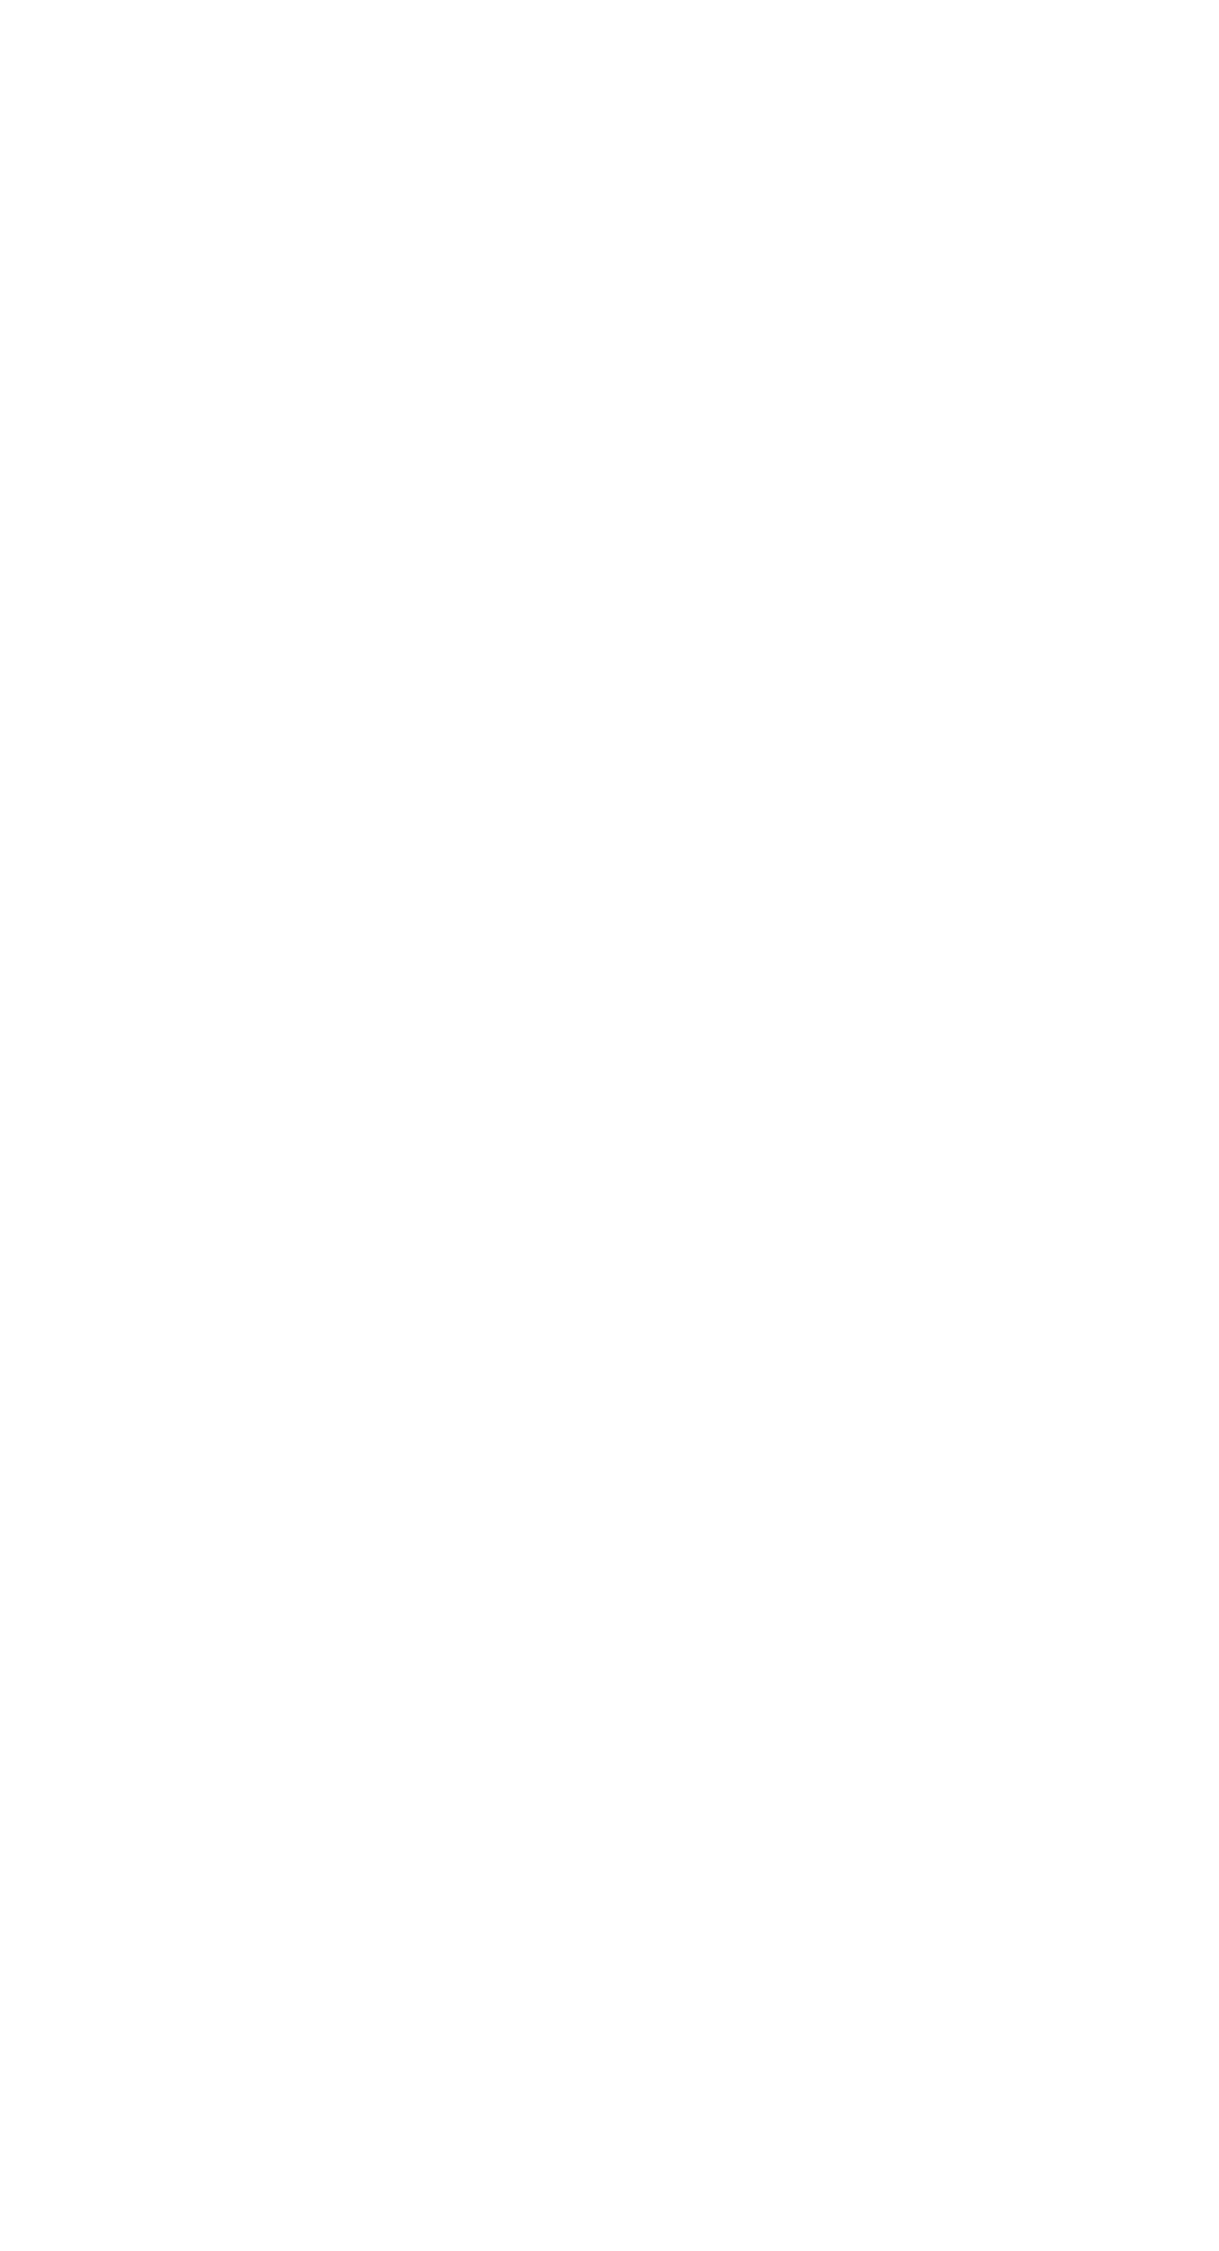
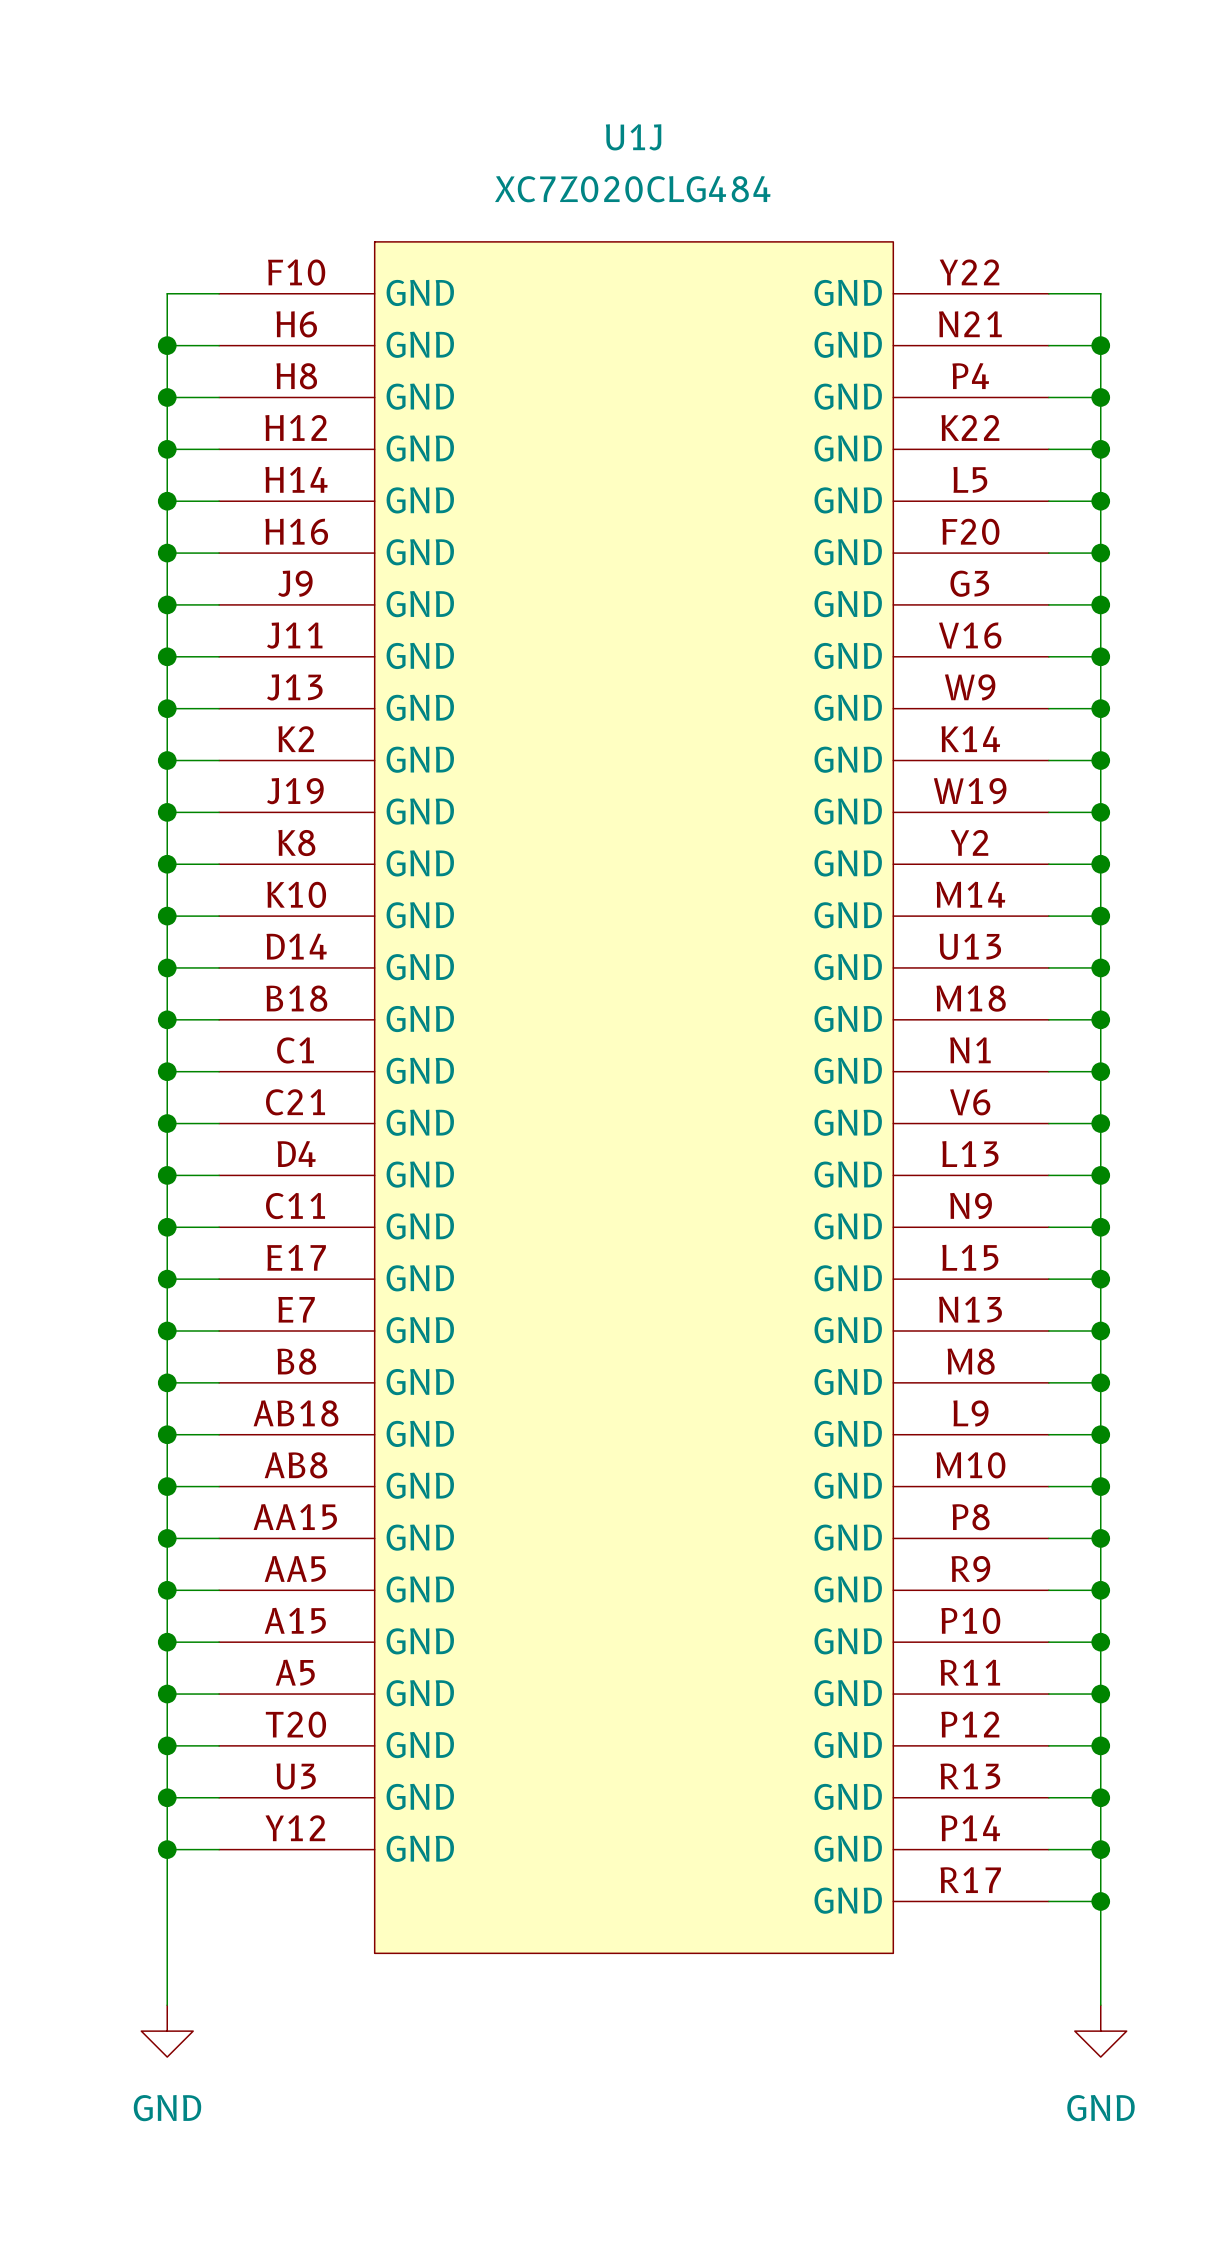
wire: none -> (219, 293) (167, 293) (167, 2005)
wire: none -> (1048, 293) (1100, 293) (1100, 2005)
wire: none -> (167, 345) (219, 345)
junction: none -> (167, 345)
wire: none -> (1048, 345) (1100, 345)
junction: none -> (1100, 345)
wire: none -> (167, 397) (219, 397)
junction: none -> (167, 397)
wire: none -> (1048, 397) (1100, 397)
junction: none -> (1100, 397)
wire: none -> (167, 449) (219, 449)
junction: none -> (167, 449)
wire: none -> (1048, 449) (1100, 449)
junction: none -> (1100, 449)
wire: none -> (167, 501) (219, 501)
junction: none -> (167, 501)
wire: none -> (1048, 501) (1100, 501)
junction: none -> (1100, 501)
wire: none -> (167, 553) (219, 553)
junction: none -> (167, 553)
wire: none -> (1048, 553) (1100, 553)
junction: none -> (1100, 553)
wire: none -> (167, 604) (219, 604)
junction: none -> (167, 604)
wire: none -> (1048, 604) (1100, 604)
junction: none -> (1100, 604)
wire: none -> (167, 656) (219, 656)
junction: none -> (167, 656)
wire: none -> (1048, 656) (1100, 656)
junction: none -> (1100, 656)
wire: none -> (167, 708) (219, 708)
junction: none -> (167, 708)
wire: none -> (1048, 708) (1100, 708)
junction: none -> (1100, 708)
wire: none -> (167, 760) (219, 760)
junction: none -> (167, 760)
wire: none -> (1048, 760) (1100, 760)
junction: none -> (1100, 760)
wire: none -> (167, 812) (219, 812)
junction: none -> (167, 812)
wire: none -> (1048, 812) (1100, 812)
junction: none -> (1100, 812)
wire: none -> (167, 864) (219, 864)
junction: none -> (167, 864)
wire: none -> (1048, 864) (1100, 864)
junction: none -> (1100, 864)
wire: none -> (167, 916) (219, 916)
junction: none -> (167, 916)
wire: none -> (1048, 916) (1100, 916)
junction: none -> (1100, 916)
wire: none -> (167, 967) (219, 967)
junction: none -> (167, 967)
wire: none -> (1048, 967) (1100, 967)
junction: none -> (1100, 967)
wire: none -> (167, 1019) (219, 1019)
junction: none -> (167, 1019)
wire: none -> (1048, 1019) (1100, 1019)
junction: none -> (1100, 1019)
wire: none -> (167, 1071) (219, 1071)
junction: none -> (167, 1071)
wire: none -> (1048, 1071) (1100, 1071)
junction: none -> (1100, 1071)
U1J: none -> XC7Z020CLG484 (633, 1097)
wire: none -> (167, 1123) (219, 1123)
junction: none -> (167, 1123)
wire: none -> (1048, 1123) (1100, 1123)
junction: none -> (1100, 1123)
wire: none -> (167, 1175) (219, 1175)
junction: none -> (167, 1175)
wire: none -> (1048, 1175) (1100, 1175)
junction: none -> (1100, 1175)
wire: none -> (167, 1227) (219, 1227)
junction: none -> (167, 1227)
wire: none -> (1048, 1227) (1100, 1227)
junction: none -> (1100, 1227)
wire: none -> (167, 1279) (219, 1279)
junction: none -> (167, 1279)
wire: none -> (1048, 1279) (1100, 1279)
junction: none -> (1100, 1279)
wire: none -> (167, 1330) (219, 1330)
junction: none -> (167, 1330)
wire: none -> (1048, 1330) (1100, 1330)
junction: none -> (1100, 1330)
wire: none -> (167, 1382) (219, 1382)
junction: none -> (167, 1382)
wire: none -> (1048, 1382) (1100, 1382)
junction: none -> (1100, 1382)
wire: none -> (167, 1434) (219, 1434)
junction: none -> (167, 1434)
wire: none -> (1048, 1434) (1100, 1434)
junction: none -> (1100, 1434)
wire: none -> (167, 1486) (219, 1486)
junction: none -> (167, 1486)
wire: none -> (1048, 1486) (1100, 1486)
junction: none -> (1100, 1486)
wire: none -> (167, 1538) (219, 1538)
junction: none -> (167, 1538)
wire: none -> (1048, 1538) (1100, 1538)
junction: none -> (1100, 1538)
wire: none -> (167, 1590) (219, 1590)
junction: none -> (167, 1590)
wire: none -> (1048, 1590) (1100, 1590)
junction: none -> (1100, 1590)
wire: none -> (167, 1642) (219, 1642)
junction: none -> (167, 1642)
wire: none -> (1048, 1642) (1100, 1642)
junction: none -> (1100, 1642)
wire: none -> (167, 1694) (219, 1694)
junction: none -> (167, 1694)
wire: none -> (1048, 1694) (1100, 1694)
junction: none -> (1100, 1694)
wire: none -> (167, 1745) (219, 1745)
junction: none -> (167, 1745)
wire: none -> (1048, 1745) (1100, 1745)
junction: none -> (1100, 1745)
wire: none -> (167, 1797) (219, 1797)
junction: none -> (167, 1797)
wire: none -> (1048, 1797) (1100, 1797)
junction: none -> (1100, 1797)
wire: none -> (167, 1849) (219, 1849)
junction: none -> (167, 1849)
wire: none -> (1048, 1849) (1100, 1849)
junction: none -> (1100, 1849)
wire: none -> (1048, 1901) (1100, 1901)
junction: none -> (1100, 1901)
power symbol: none -> GND (167, 2031)
power symbol: none -> GND (1100, 2031)

